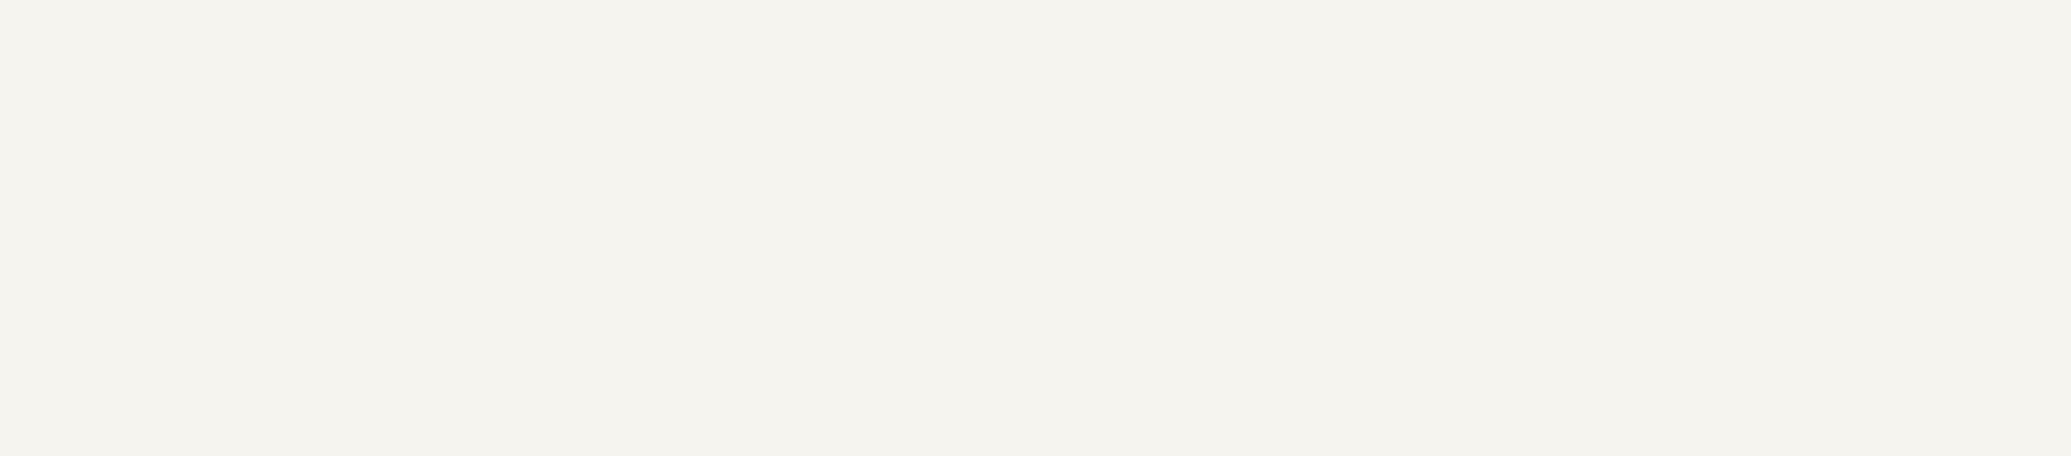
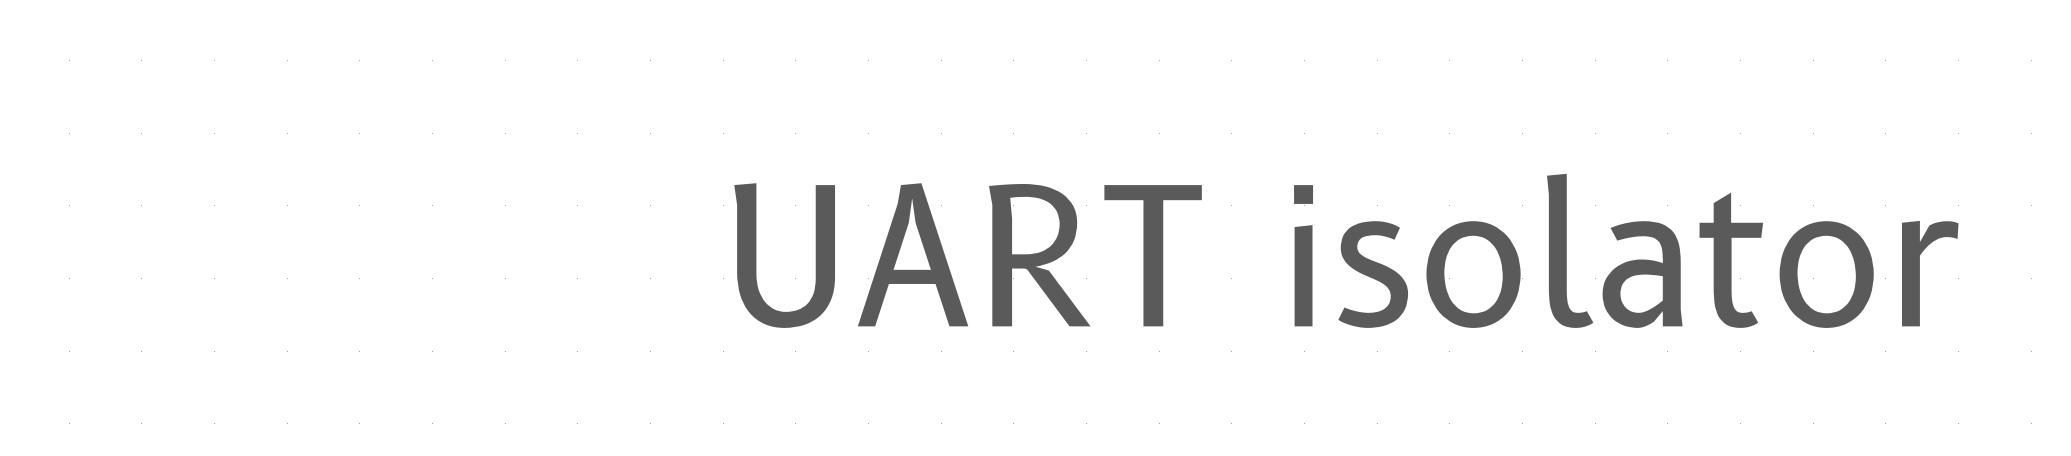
text: none -> UART isolator (1346, 250)

